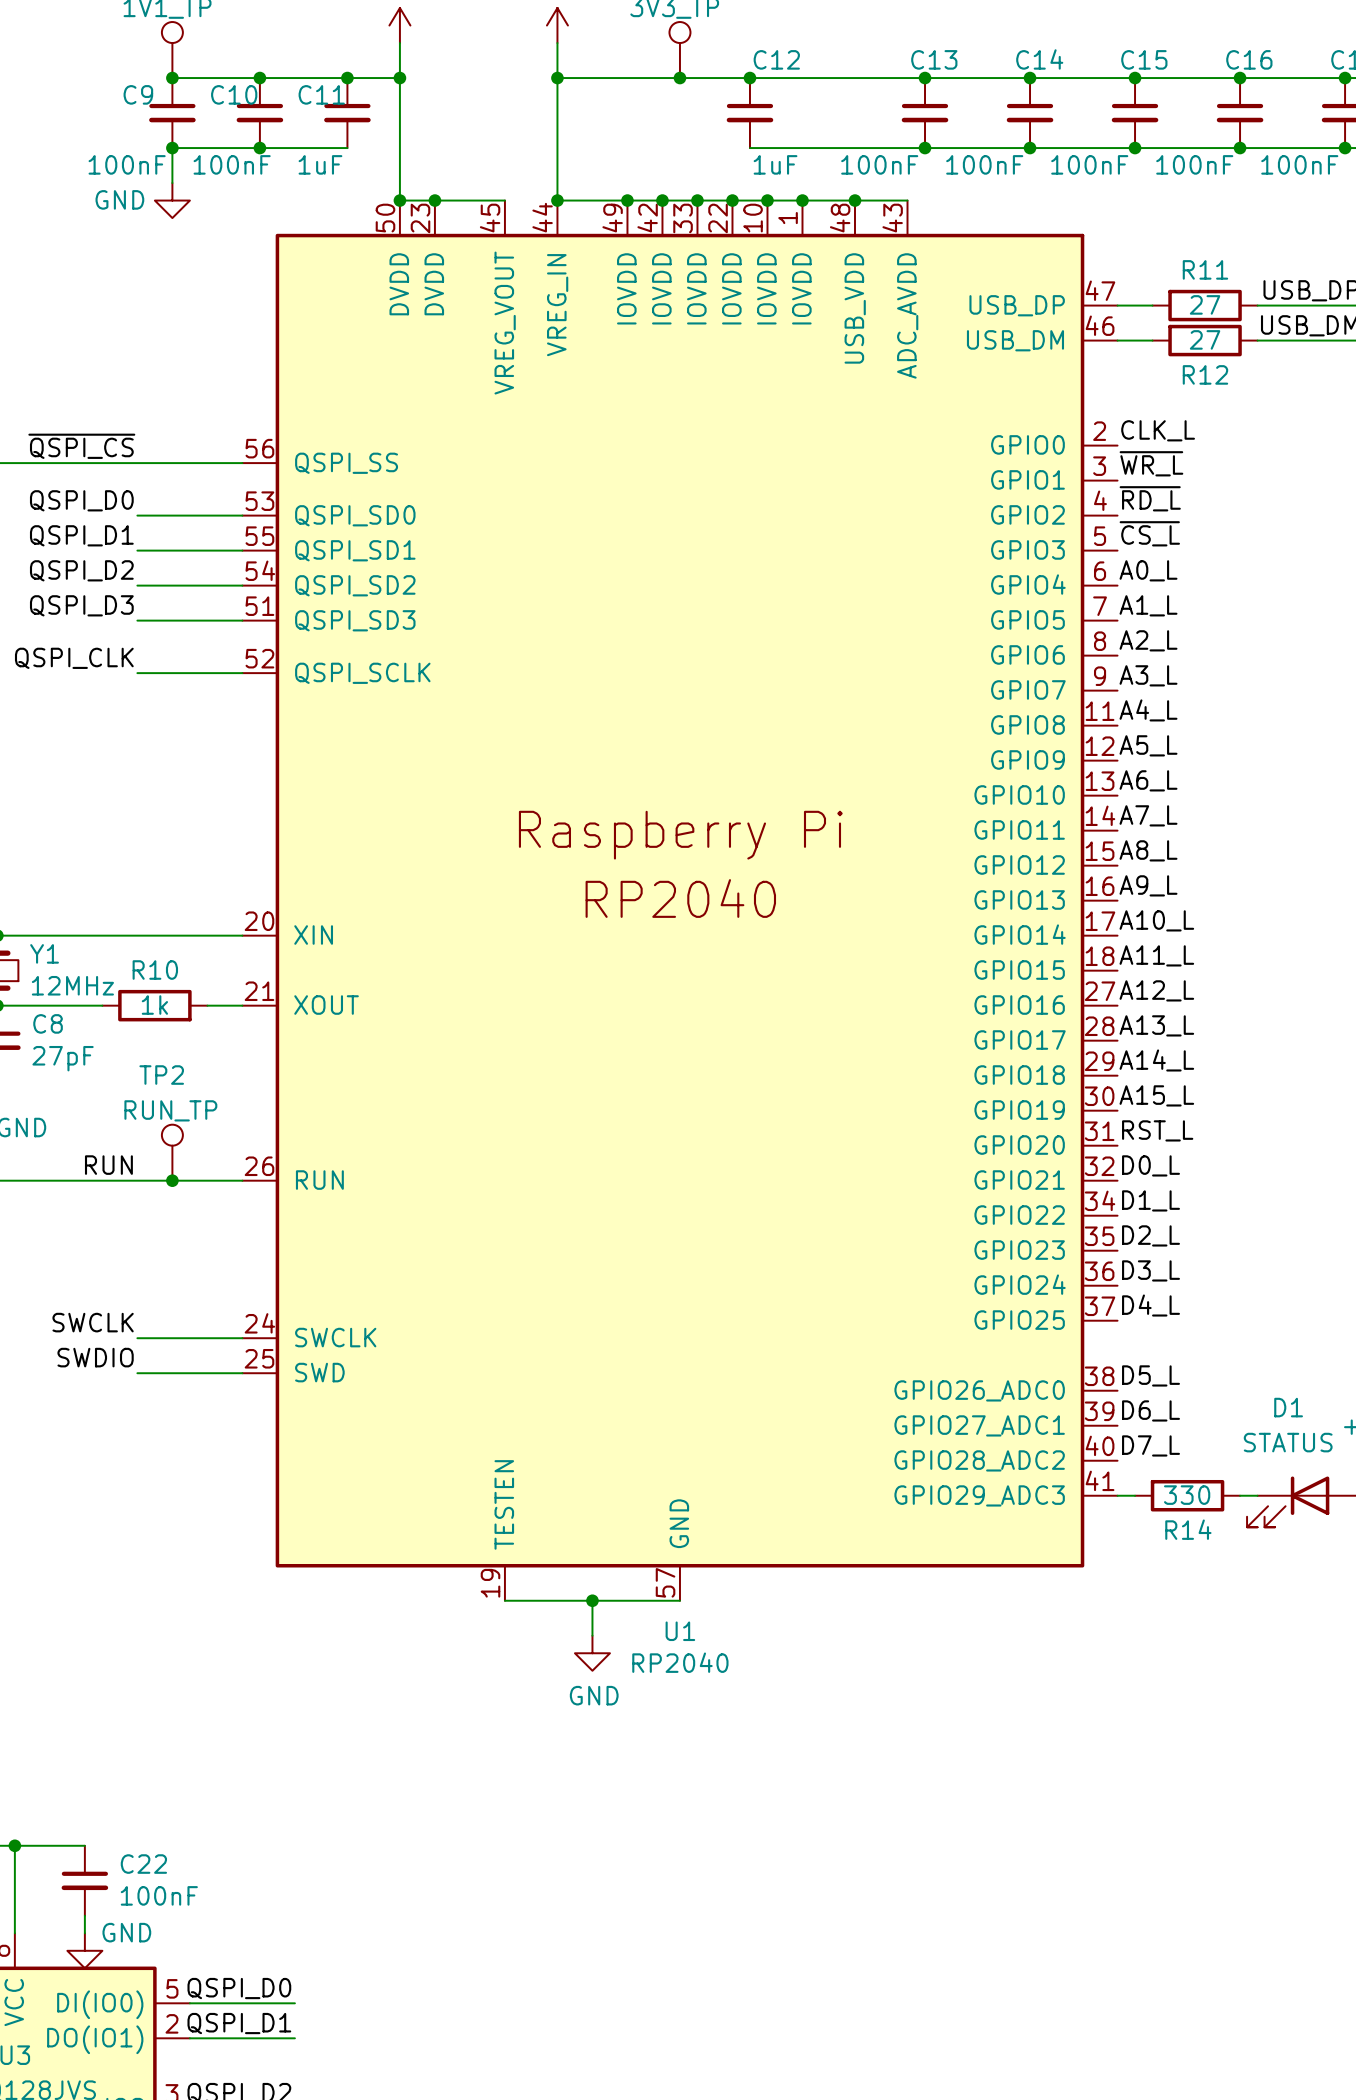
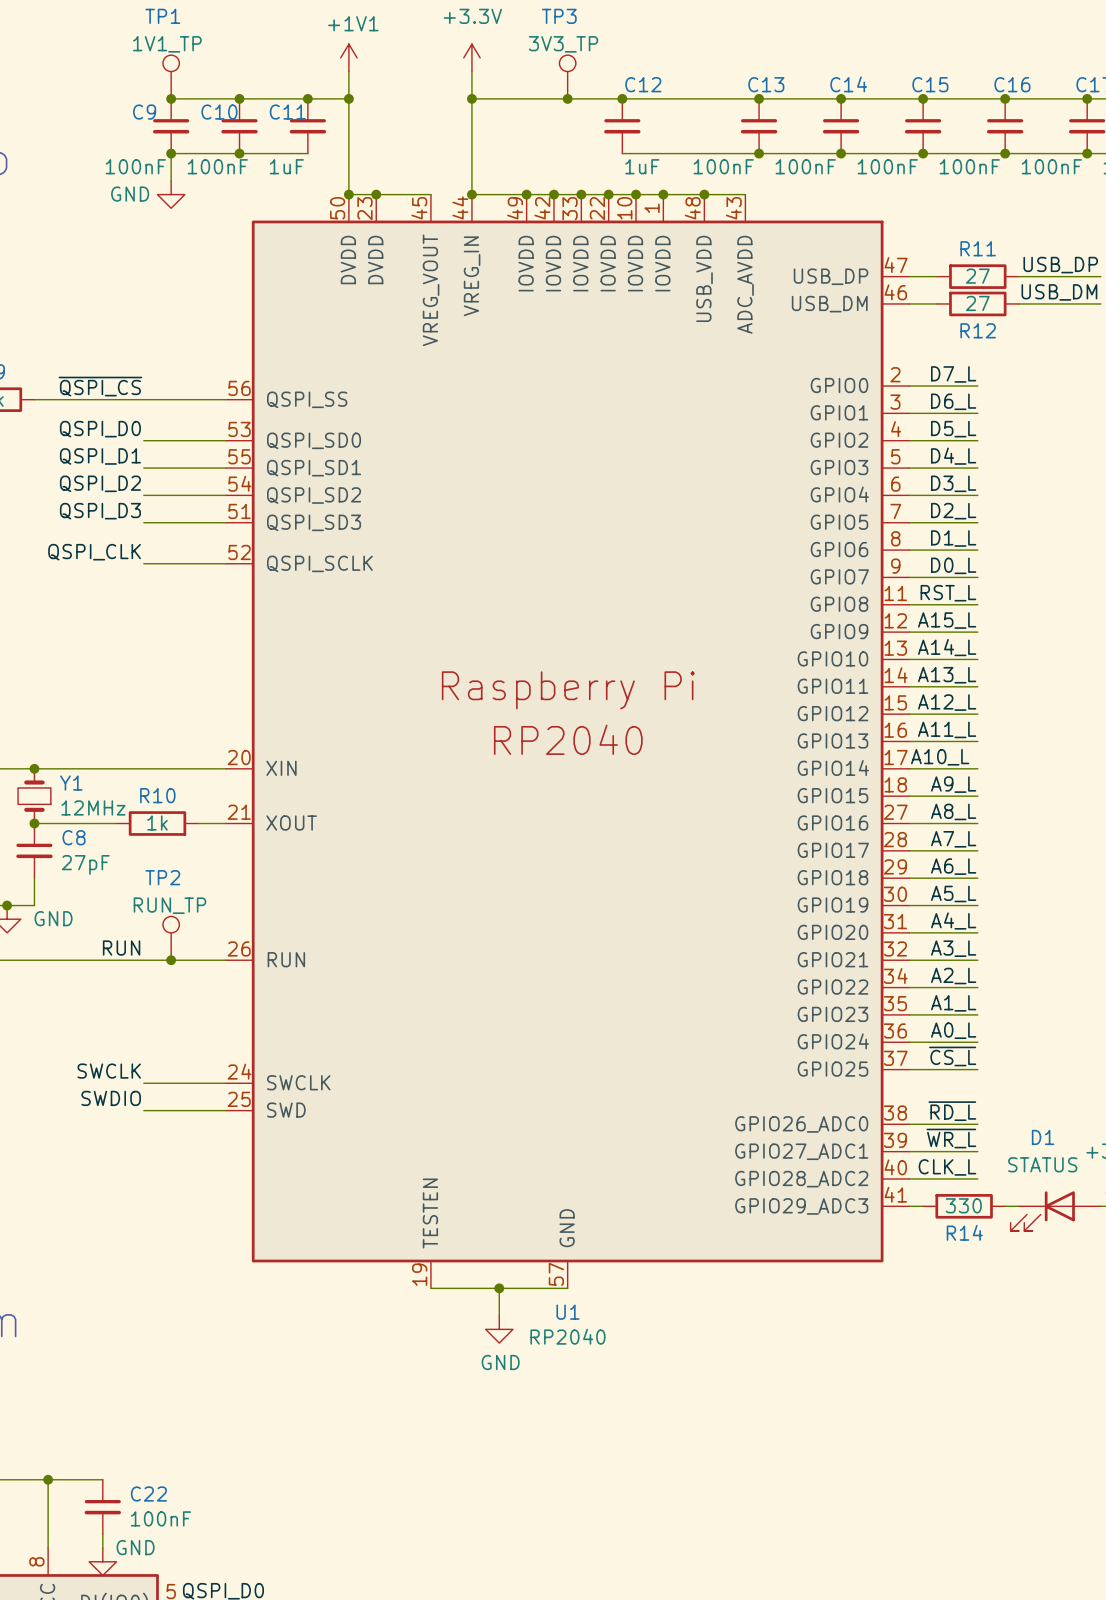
label: CLK_L (1158, 430) -> none
label: none -> D7_L (953, 374)
wire: none -> (909, 386) (977, 386)
label: ~{WR_L} (1151, 463) -> none
label: none -> D6_L (953, 401)
wire: none -> (909, 413) (977, 413)
label: ~{RD_L} (1150, 498) -> none
label: none -> D5_L (953, 429)
wire: none -> (909, 440) (977, 440)
label: ~{CS_L} (1149, 533) -> none
label: none -> D4_L (953, 456)
wire: none -> (909, 468) (977, 468)
label: A0_L (1148, 570) -> none
label: none -> D3_L (953, 483)
wire: none -> (909, 495) (977, 495)
label: A1_L (1148, 605) -> D1_L (953, 538)
wire: none -> (909, 522) (977, 522)
label: A2_L (1148, 640) -> D2_L (953, 511)
wire: none -> (909, 550) (977, 550)
label: A3_L (1148, 675) -> none
label: none -> D0_L (953, 565)
wire: none -> (909, 577) (977, 577)
label: A4_L (1148, 710) -> none
label: none -> RST_L (948, 593)
wire: none -> (909, 604) (977, 604)
label: A5_L (1148, 745) -> none
label: none -> A15_L (947, 620)
wire: none -> (909, 632) (977, 632)
label position: A6_L (1148, 780) -> A6_L (953, 866)
wire: none -> (909, 659) (977, 659)
label position: A7_L (1148, 815) -> A7_L (953, 839)
wire: none -> (909, 686) (977, 686)
label position: A8_L (1148, 850) -> A8_L (953, 811)
wire: none -> (909, 714) (977, 714)
label position: A9_L (1148, 885) -> A9_L (953, 784)
wire: none -> (909, 741) (977, 741)
wire: none -> (909, 768) (977, 768)
label position: A11_L (1156, 955) -> A11_L (947, 729)
wire: none -> (909, 796) (977, 796)
label position: A12_L (1156, 990) -> A12_L (947, 702)
wire: none -> (909, 823) (977, 823)
label position: A13_L (1156, 1025) -> A13_L (947, 675)
wire: none -> (909, 850) (977, 850)
label position: A14_L (1156, 1060) -> A14_L (947, 647)
wire: none -> (909, 878) (977, 878)
label: A15_L (1156, 1095) -> none
label: none -> A5_L (953, 893)
wire: none -> (909, 905) (977, 905)
label: RST_L (1157, 1130) -> none
label: none -> A4_L (953, 921)
wire: none -> (909, 932) (977, 932)
label: D0_L (1151, 1165) -> none
label: none -> A3_L (953, 948)
wire: none -> (909, 960) (977, 960)
label: D1_L (1151, 1200) -> A1_L (953, 1003)
wire: none -> (909, 987) (977, 987)
label: D2_L (1151, 1235) -> A2_L (953, 976)
wire: none -> (909, 1014) (977, 1014)
label: D3_L (1151, 1270) -> none
label: none -> A0_L (953, 1030)
wire: none -> (909, 1042) (977, 1042)
label: none -> ~{CS_L} (952, 1056)
label: D4_L (1151, 1305) -> none
wire: none -> (909, 1069) (977, 1069)
label: none -> ~{RD_L} (952, 1111)
label: D5_L (1151, 1375) -> none
wire: none -> (909, 1124) (977, 1124)
label: none -> ~{WR_L} (951, 1138)
label: D6_L (1151, 1410) -> none
wire: none -> (909, 1151) (977, 1151)
label: D7_L (1151, 1445) -> none
label: none -> CLK_L (947, 1167)
wire: none -> (909, 1178) (977, 1178)

